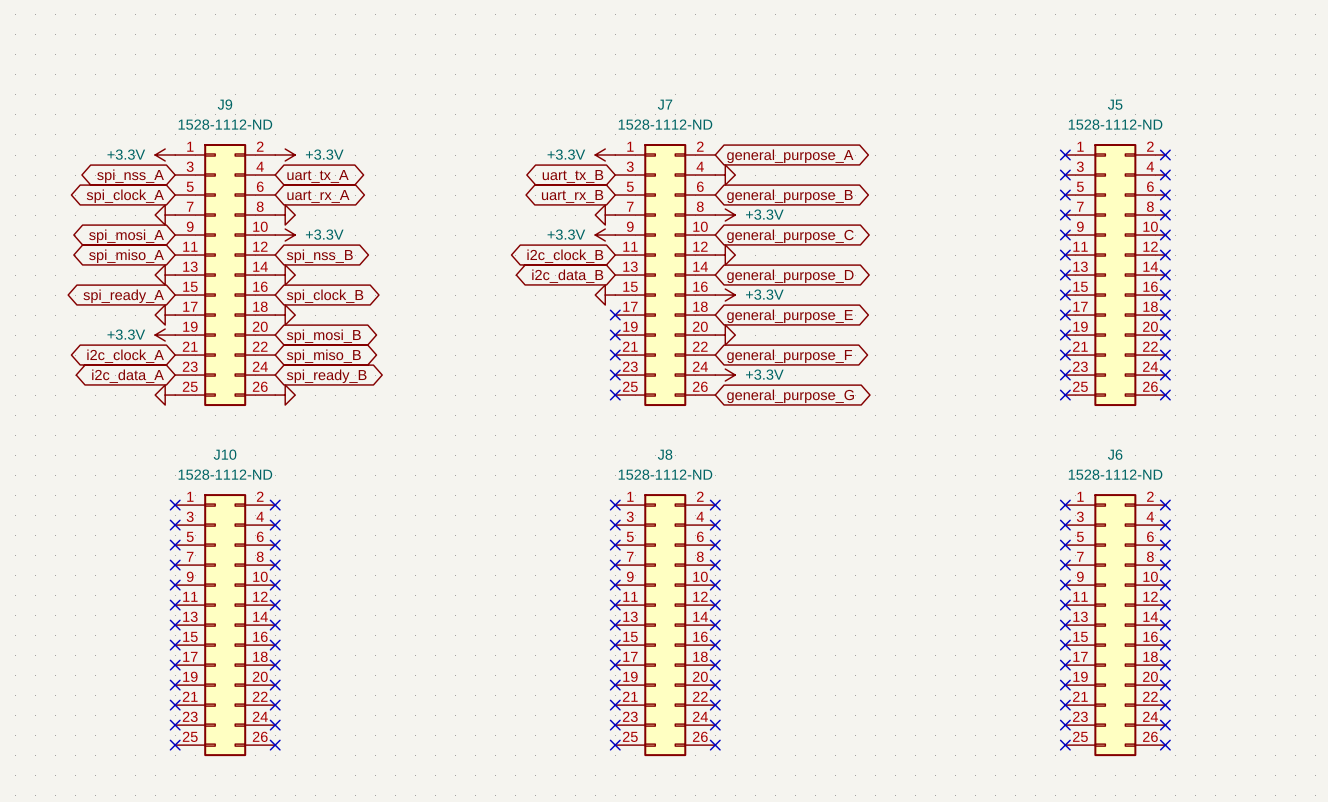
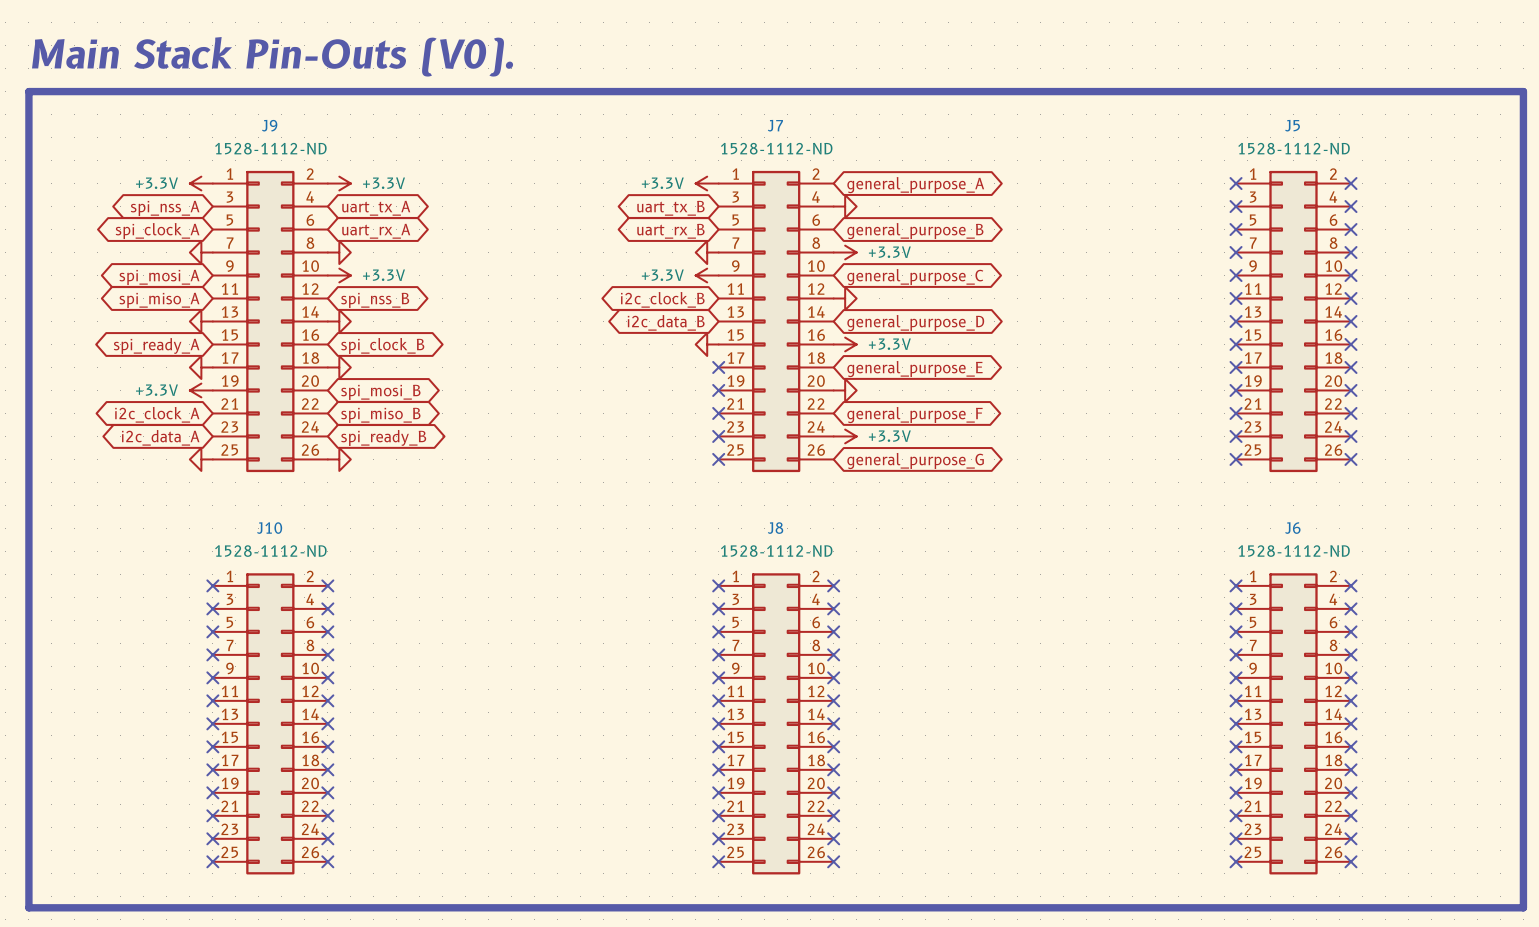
text: none -> Main Stack Pin-Outs (V0). (272, 56)
line: none -> (28, 91) (1523, 91) (1523, 907) (28, 907) (28, 91)

